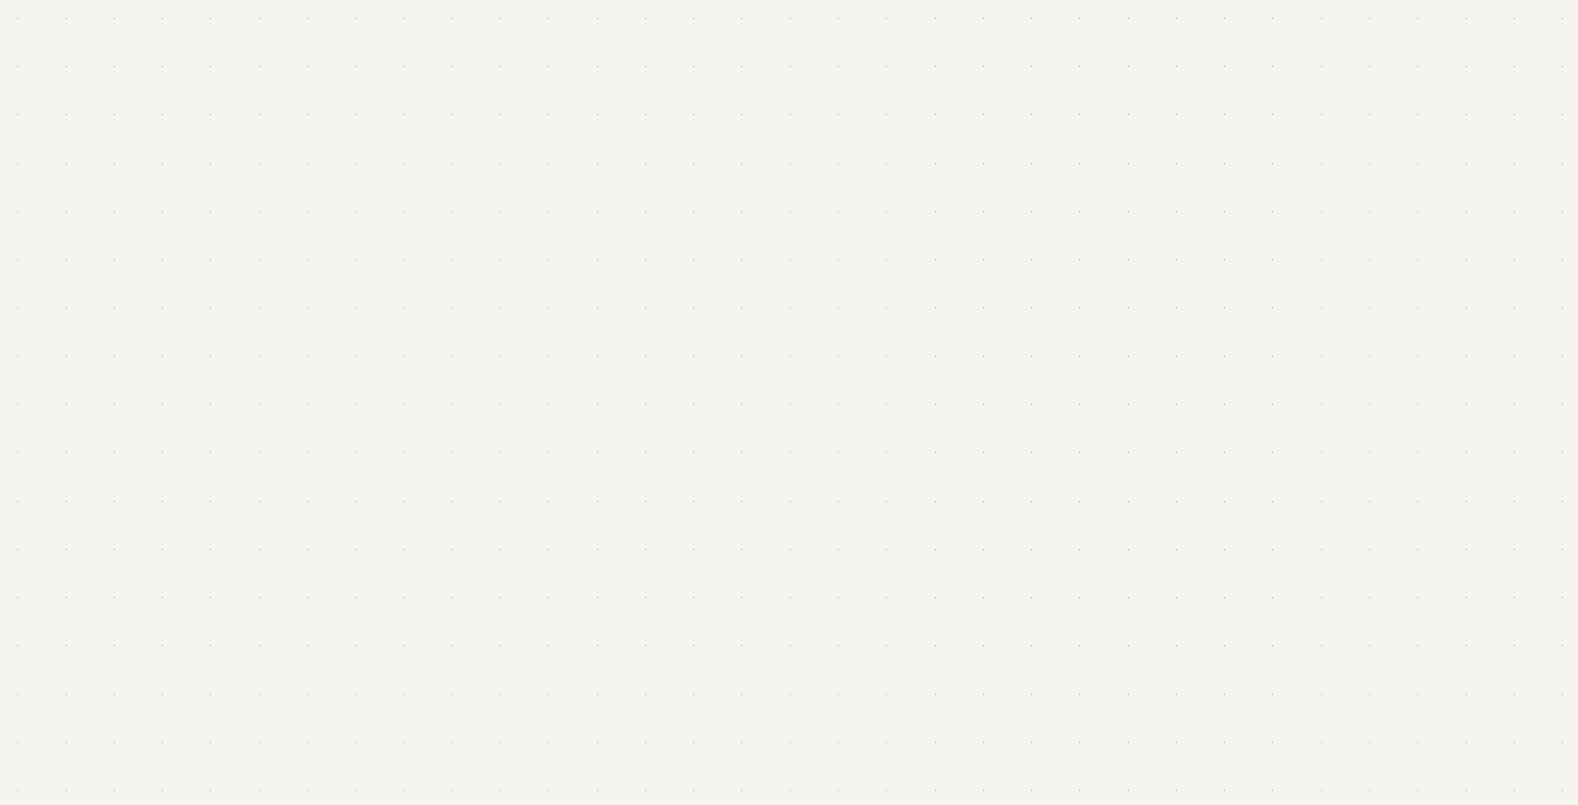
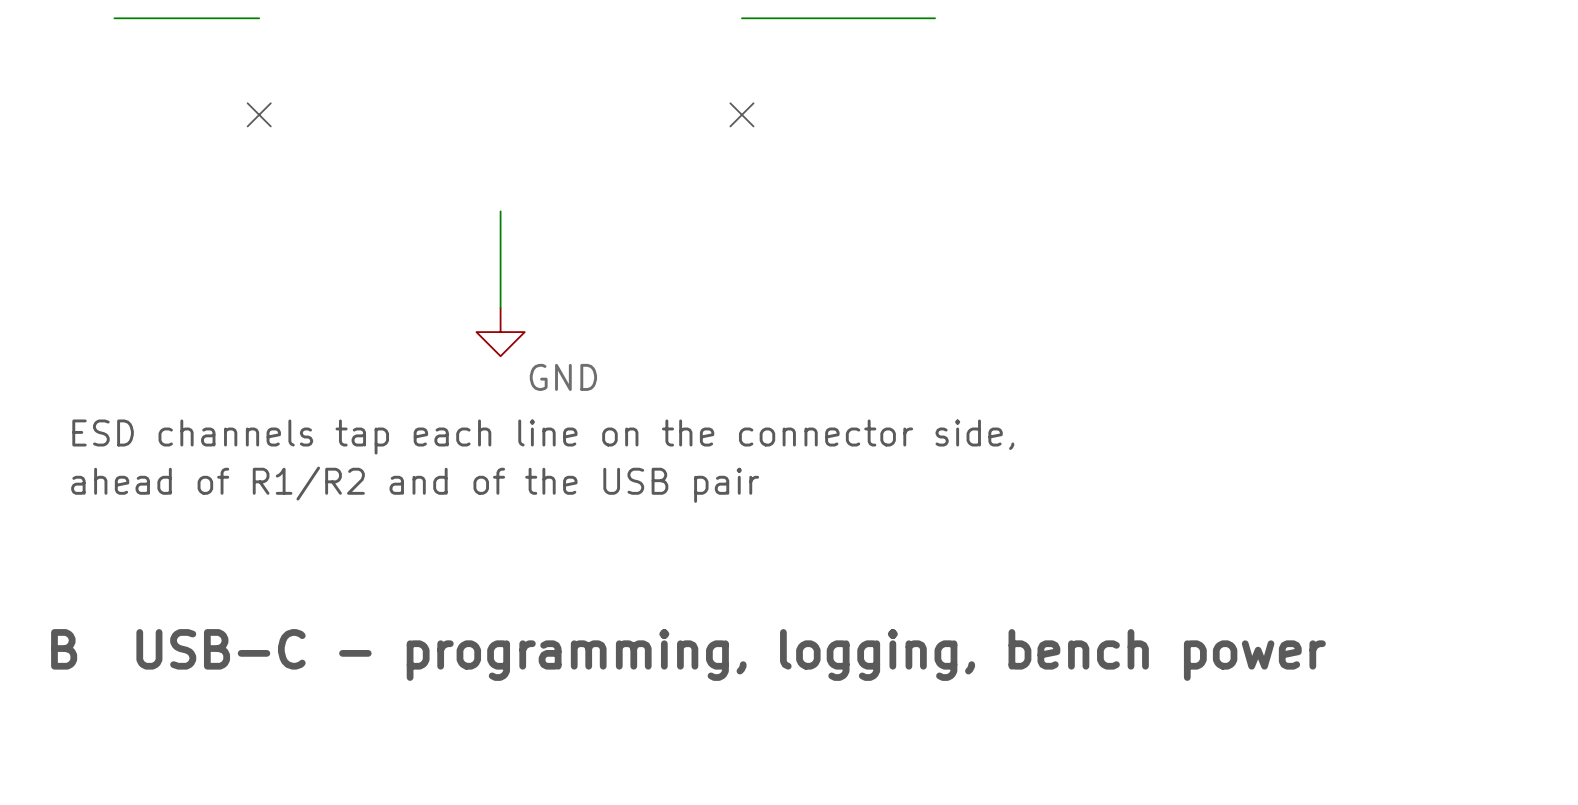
wire: none -> (114, 18) (259, 18)
wire: none -> (741, 18) (935, 18)
no-connect mark: none -> (259, 114)
no-connect mark: none -> (741, 114)
wire: none -> (500, 211) (500, 307)
power symbol: none -> GND (500, 332)
text: none -> ESD channels tap each line on the connector side, (543, 437)
text: none -> ahead of R1/R2 and of the USB pair (415, 484)
text: none -> B USB-C - programming, logging, bench power (688, 654)

